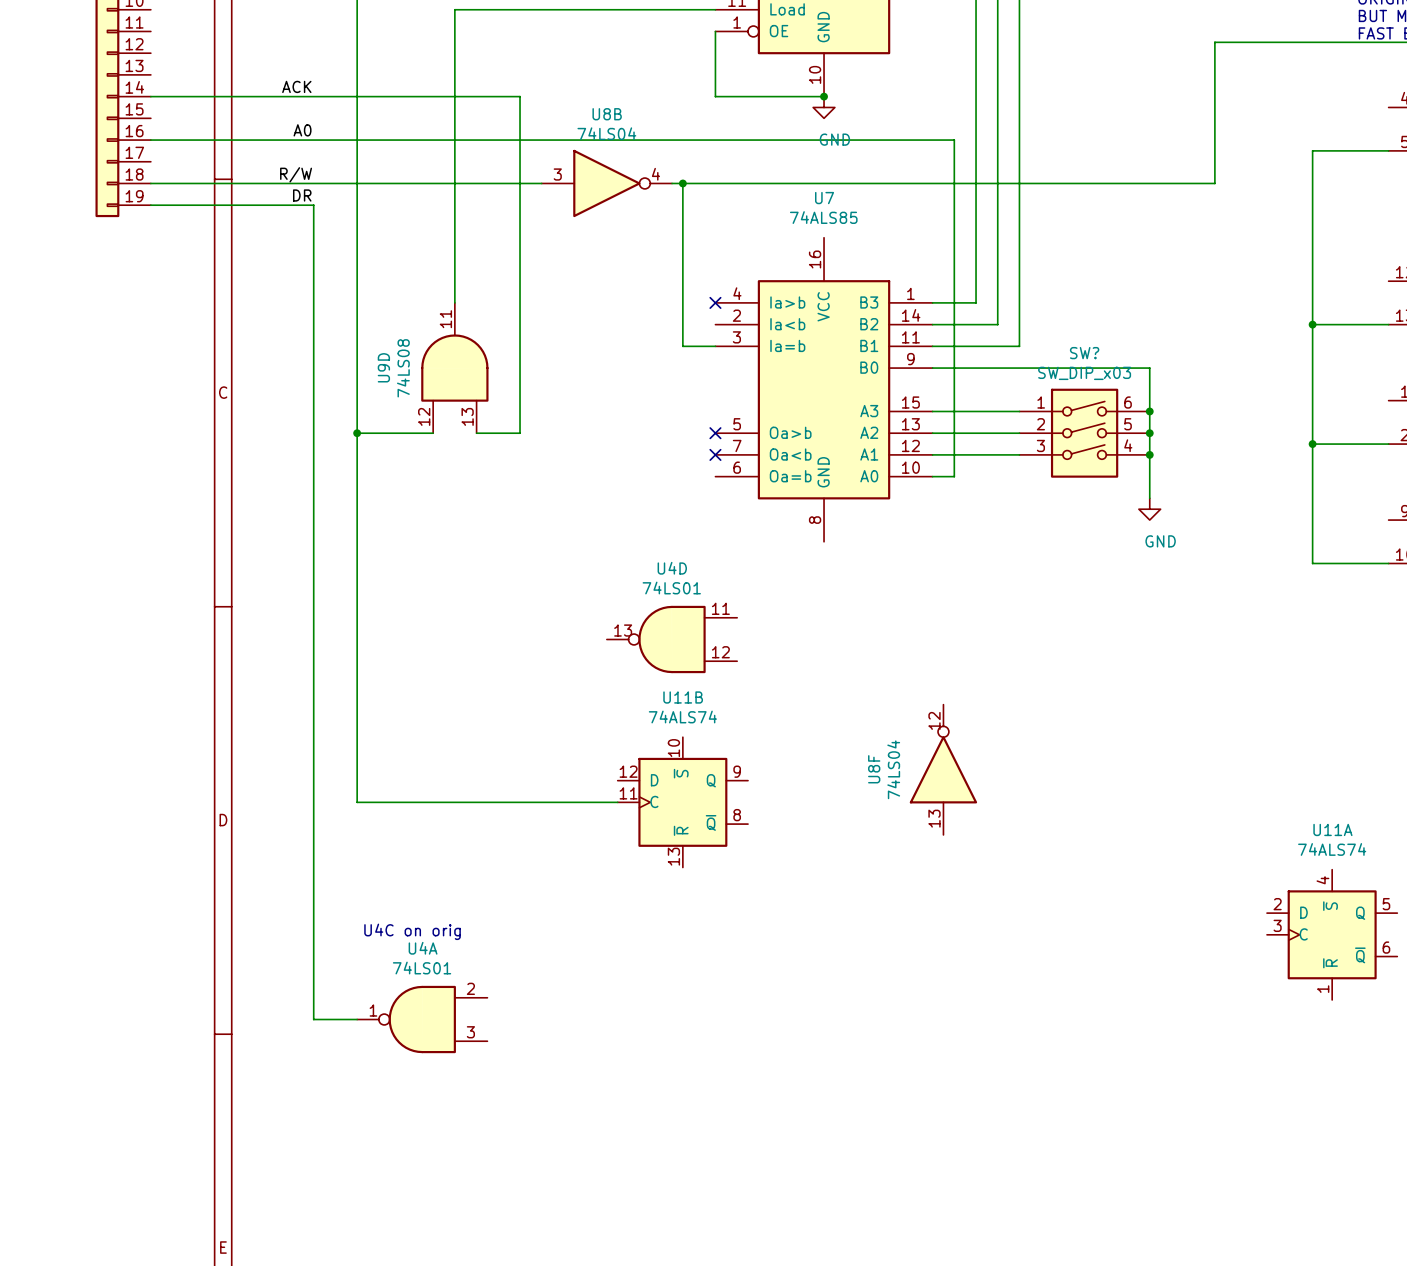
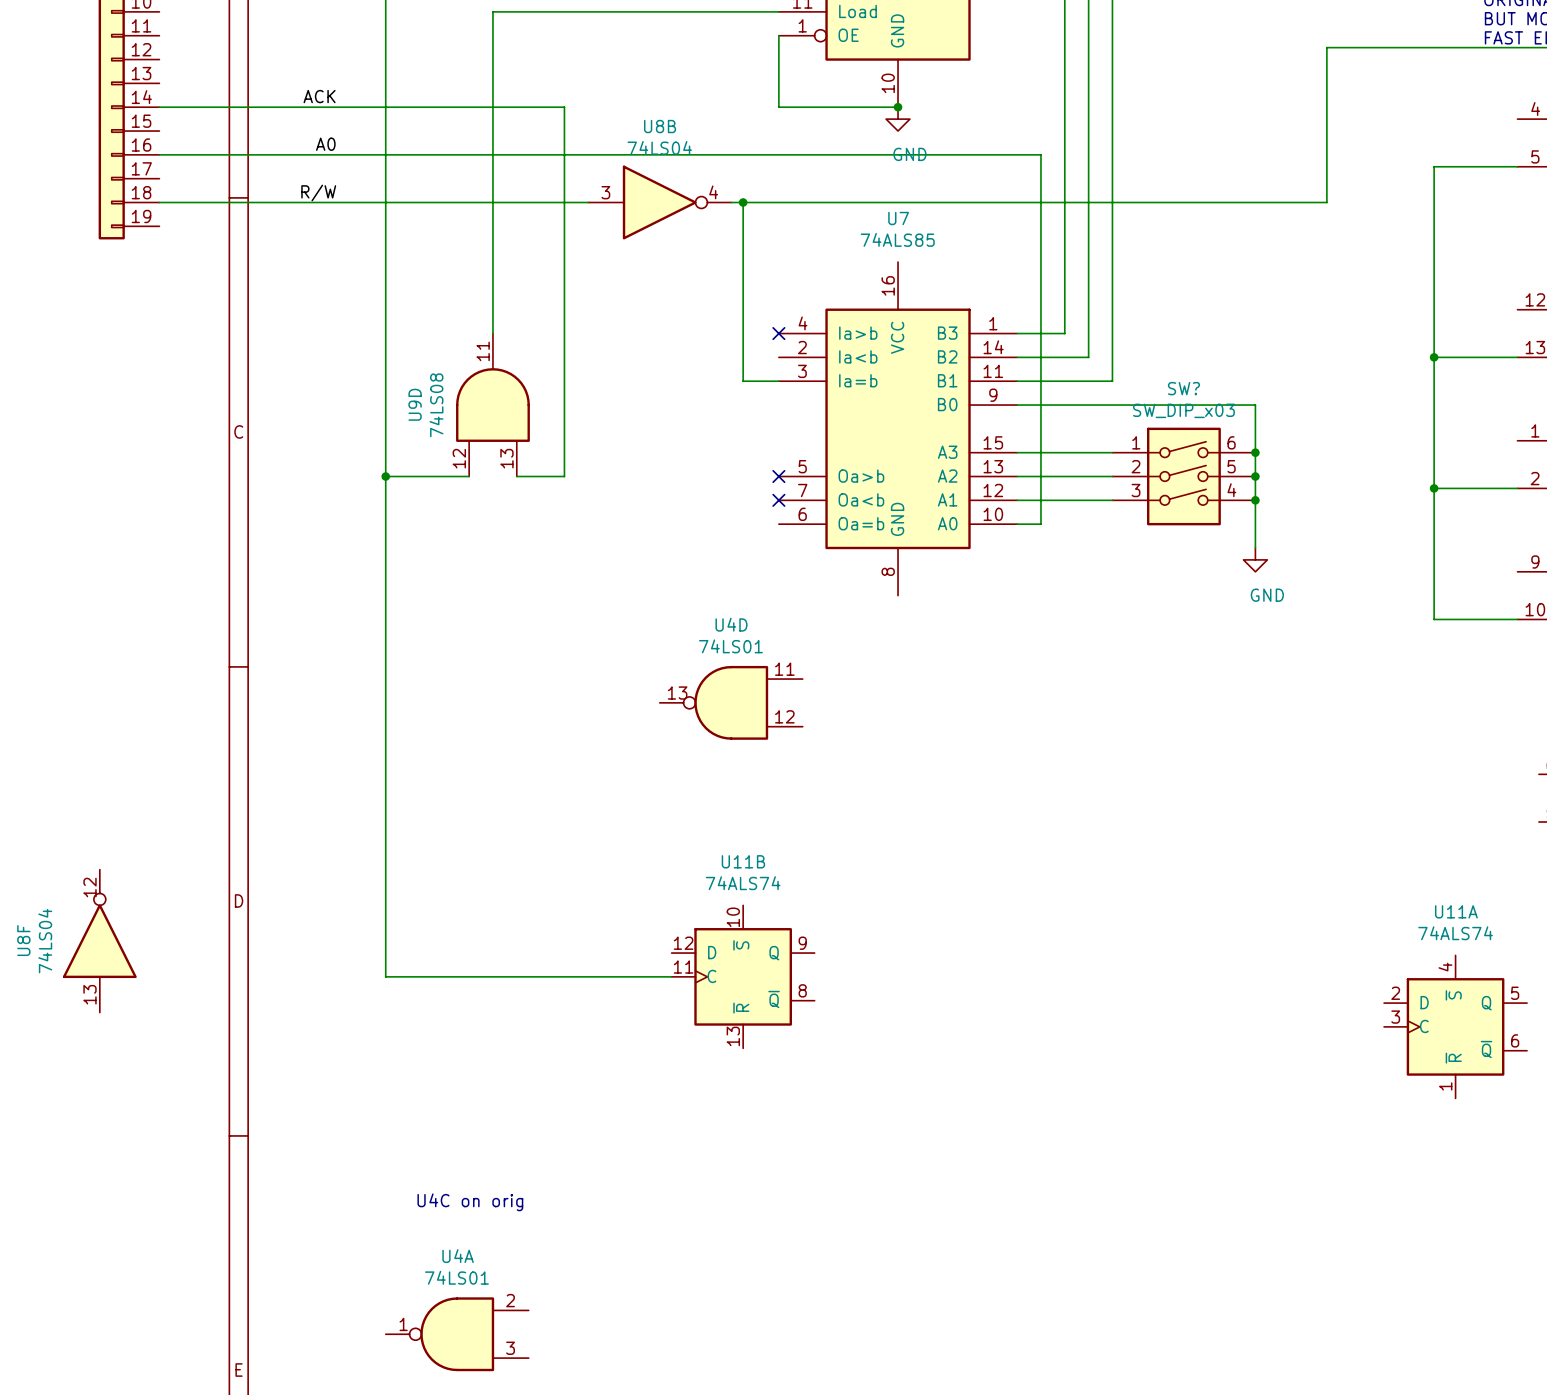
label: DR (302, 195) -> none
wire: (150, 205) (313, 205) (313, 1019) (357, 1019) -> none
U8F position: (943, 769) -> (99, 941)
wire: (357, 802) (617, 802) -> (385, 881) (385, 976) (671, 976)
U11B position: (682, 802) -> (743, 976)
text position: U4C on orig (412, 931) -> U4C on orig (470, 1202)
U4A position: (422, 1019) -> (457, 1334)

